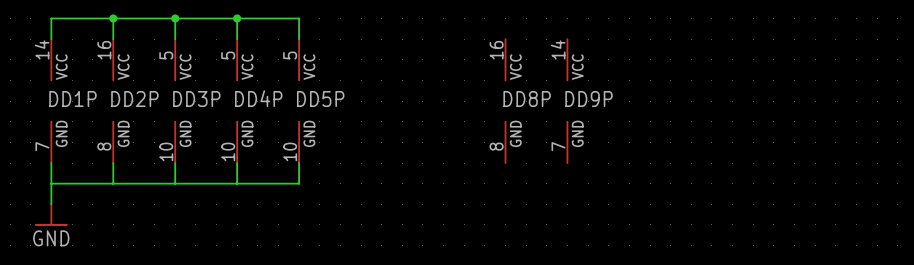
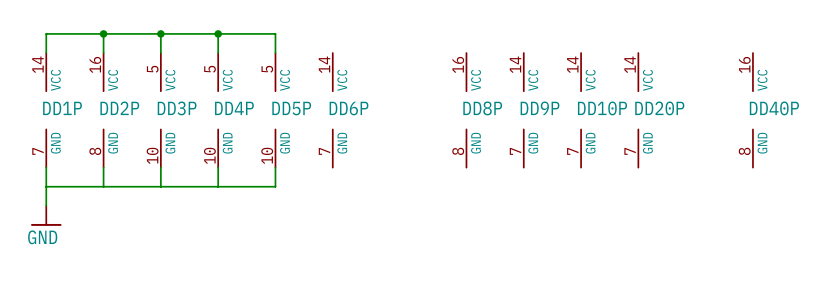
DD6P: none -> (332, 110)
DD10P: none -> (581, 110)
DD20P: none -> (638, 110)
DD40P: none -> (752, 110)

